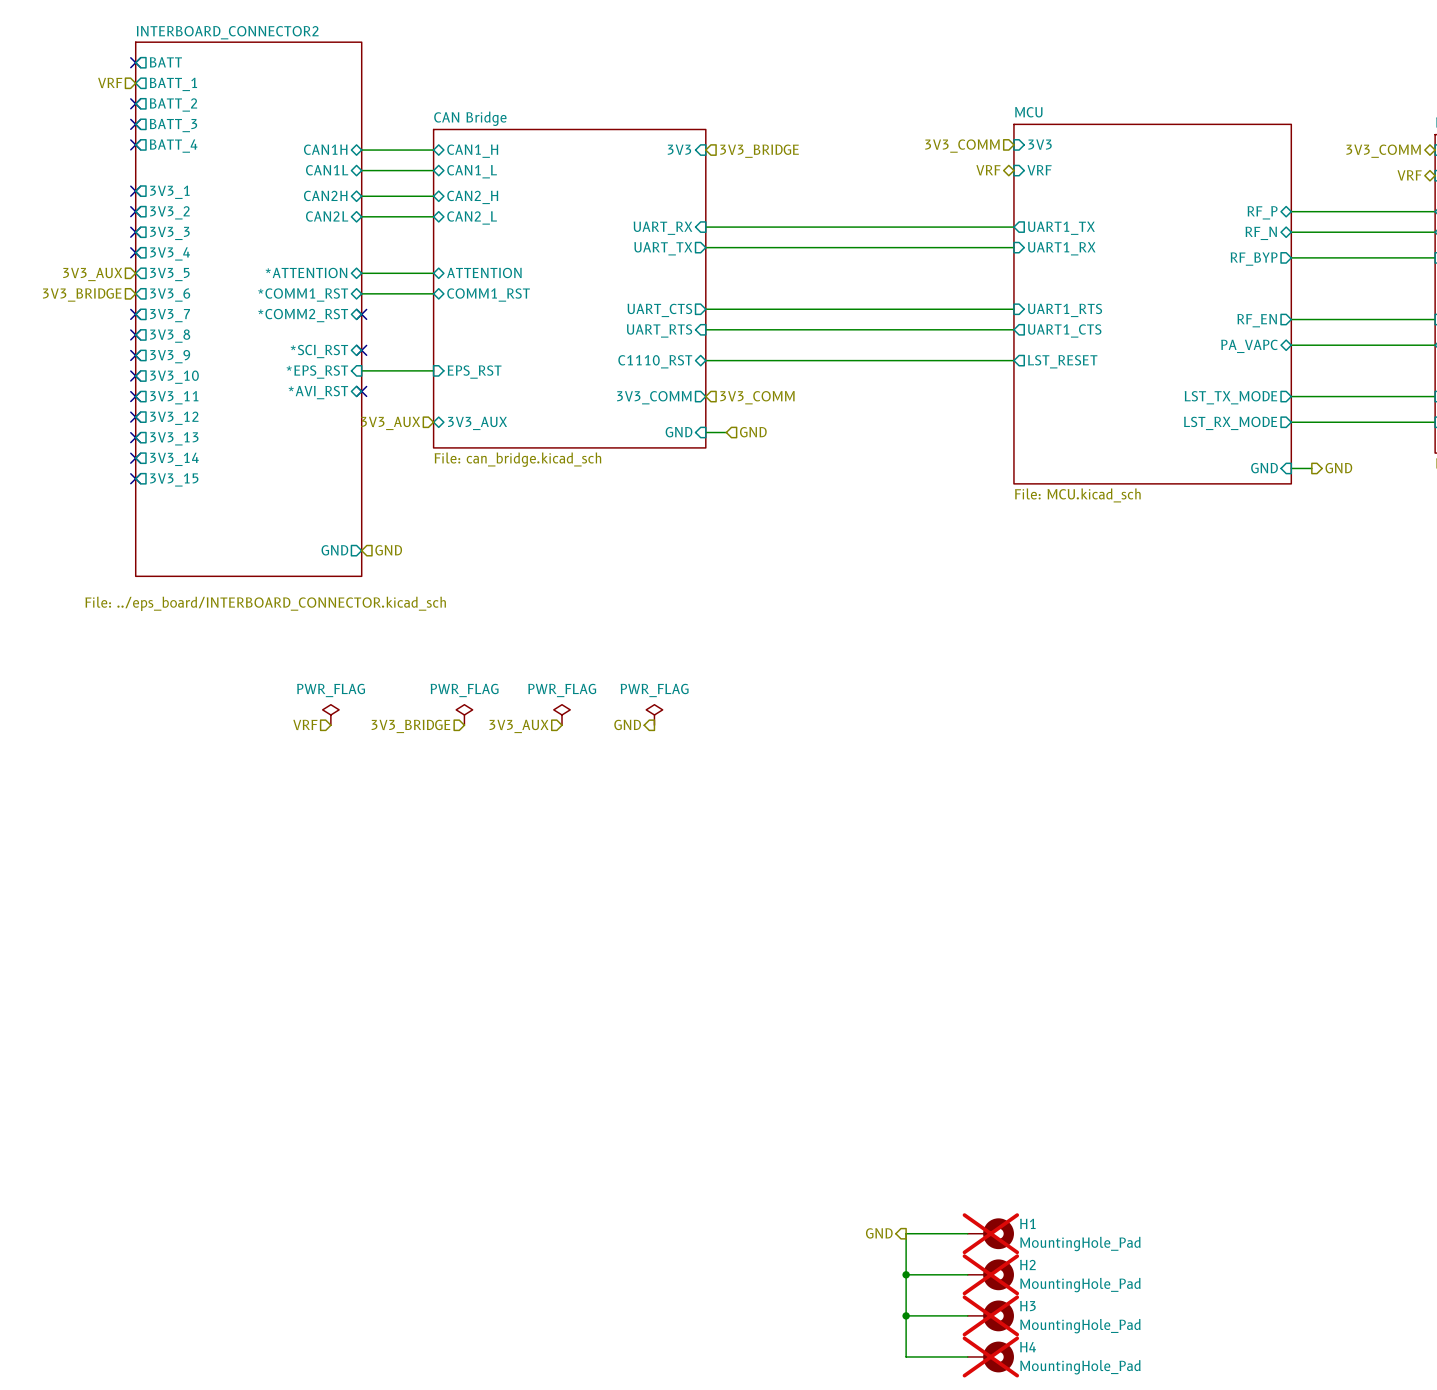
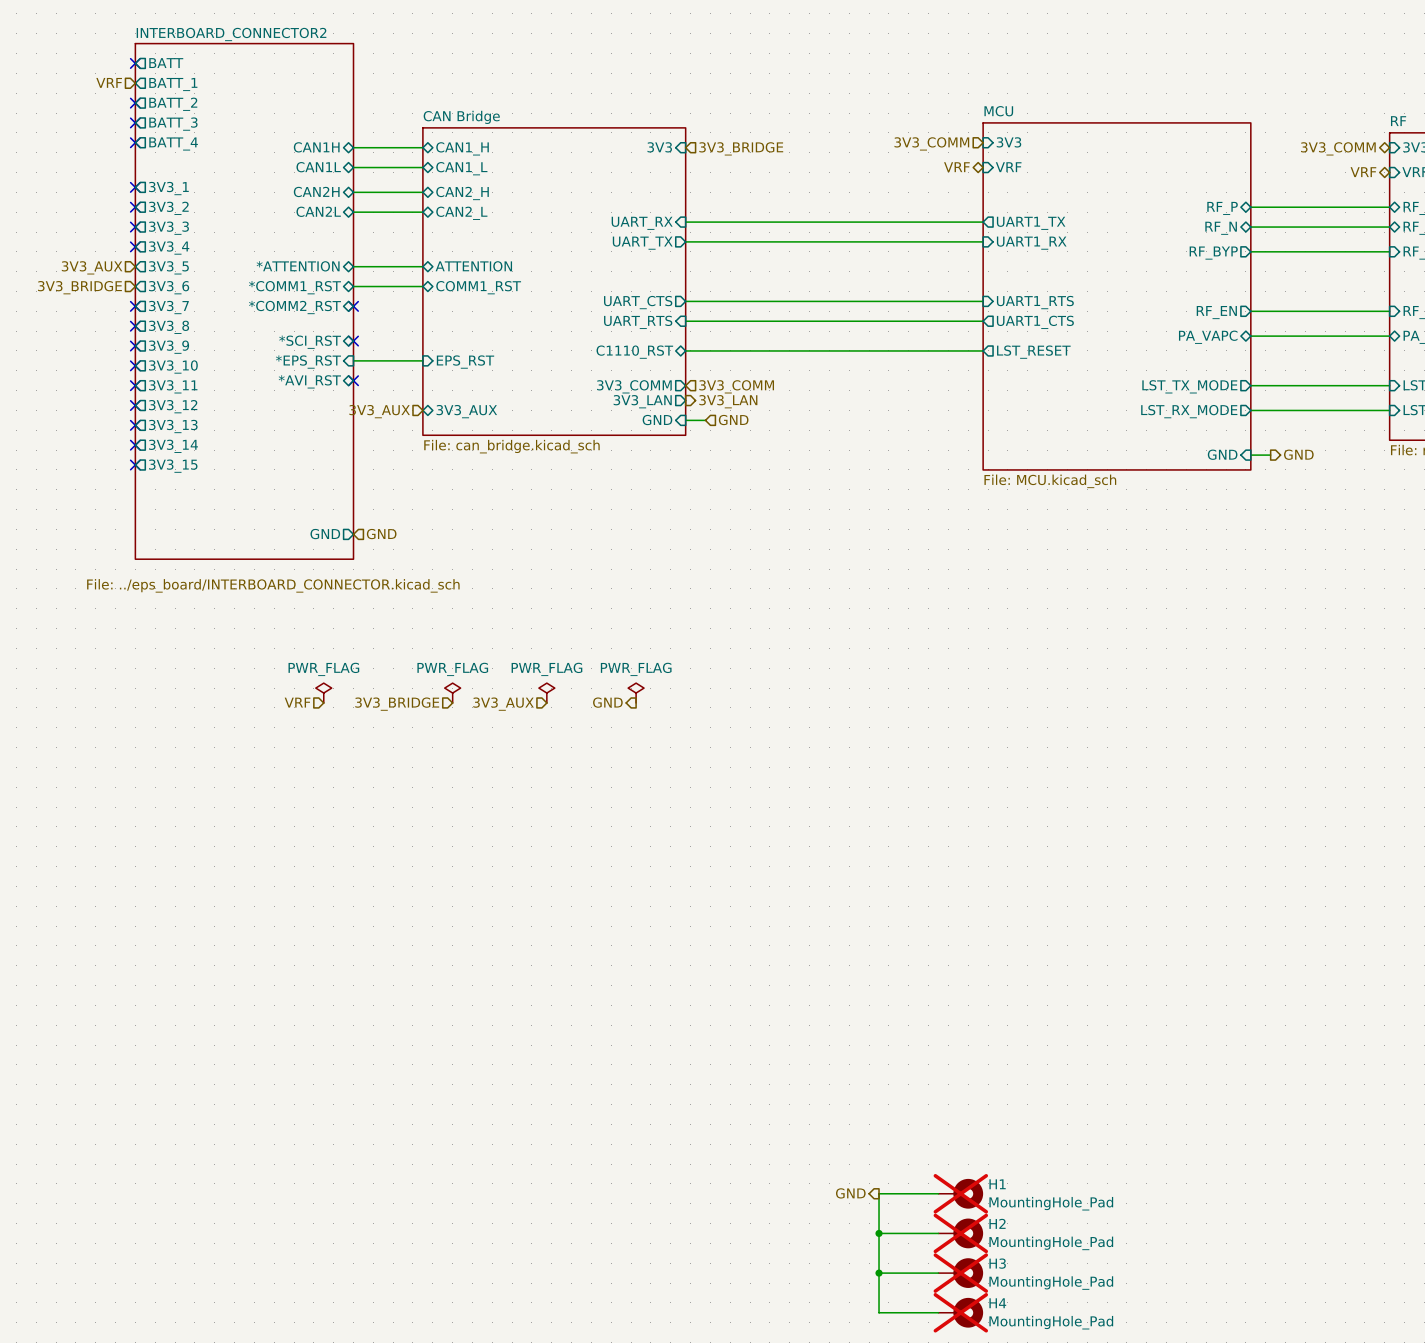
sheet pin: none -> 3V3_LAN (642, 401)
hierarchical label: none -> 3V3_LAN (728, 401)

